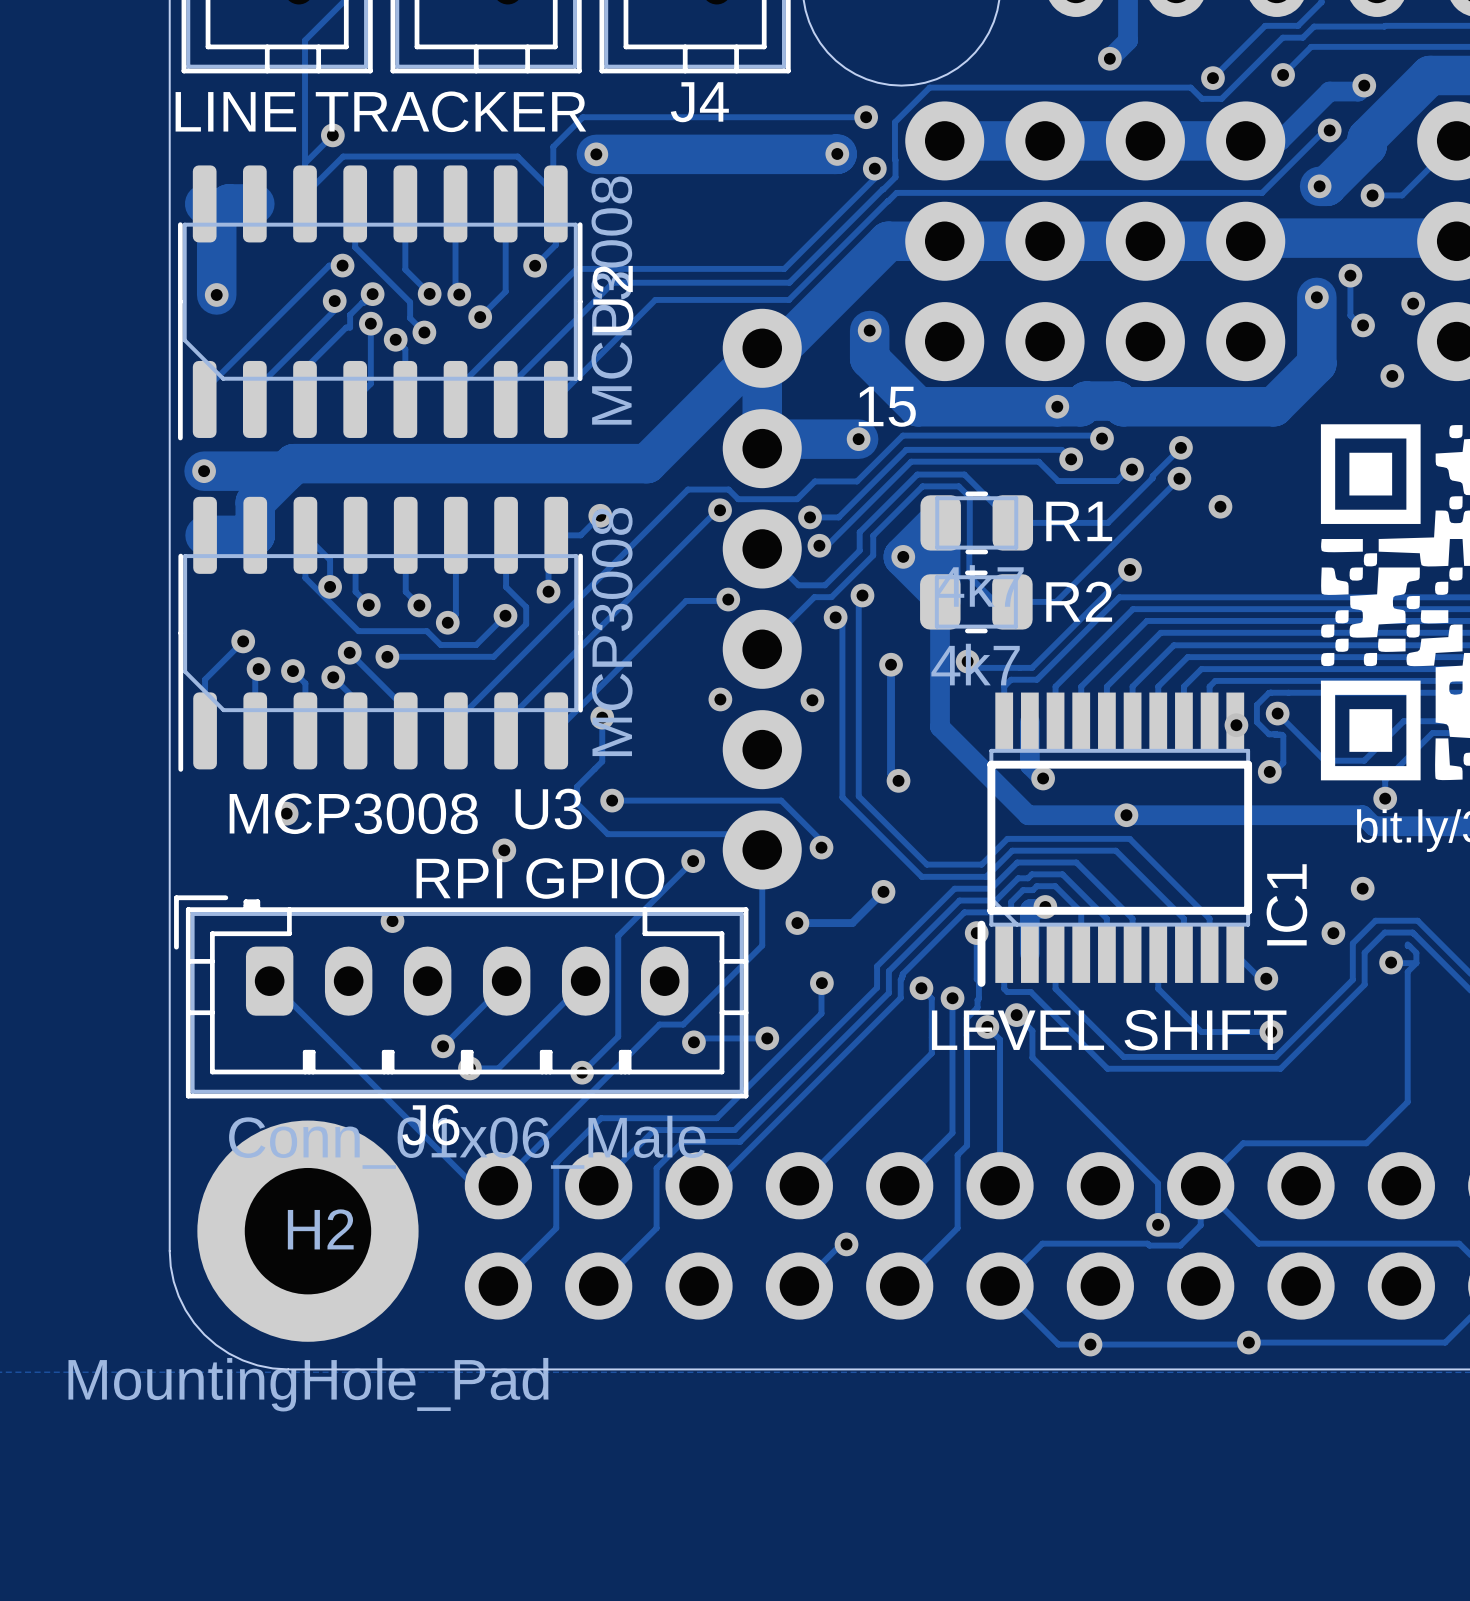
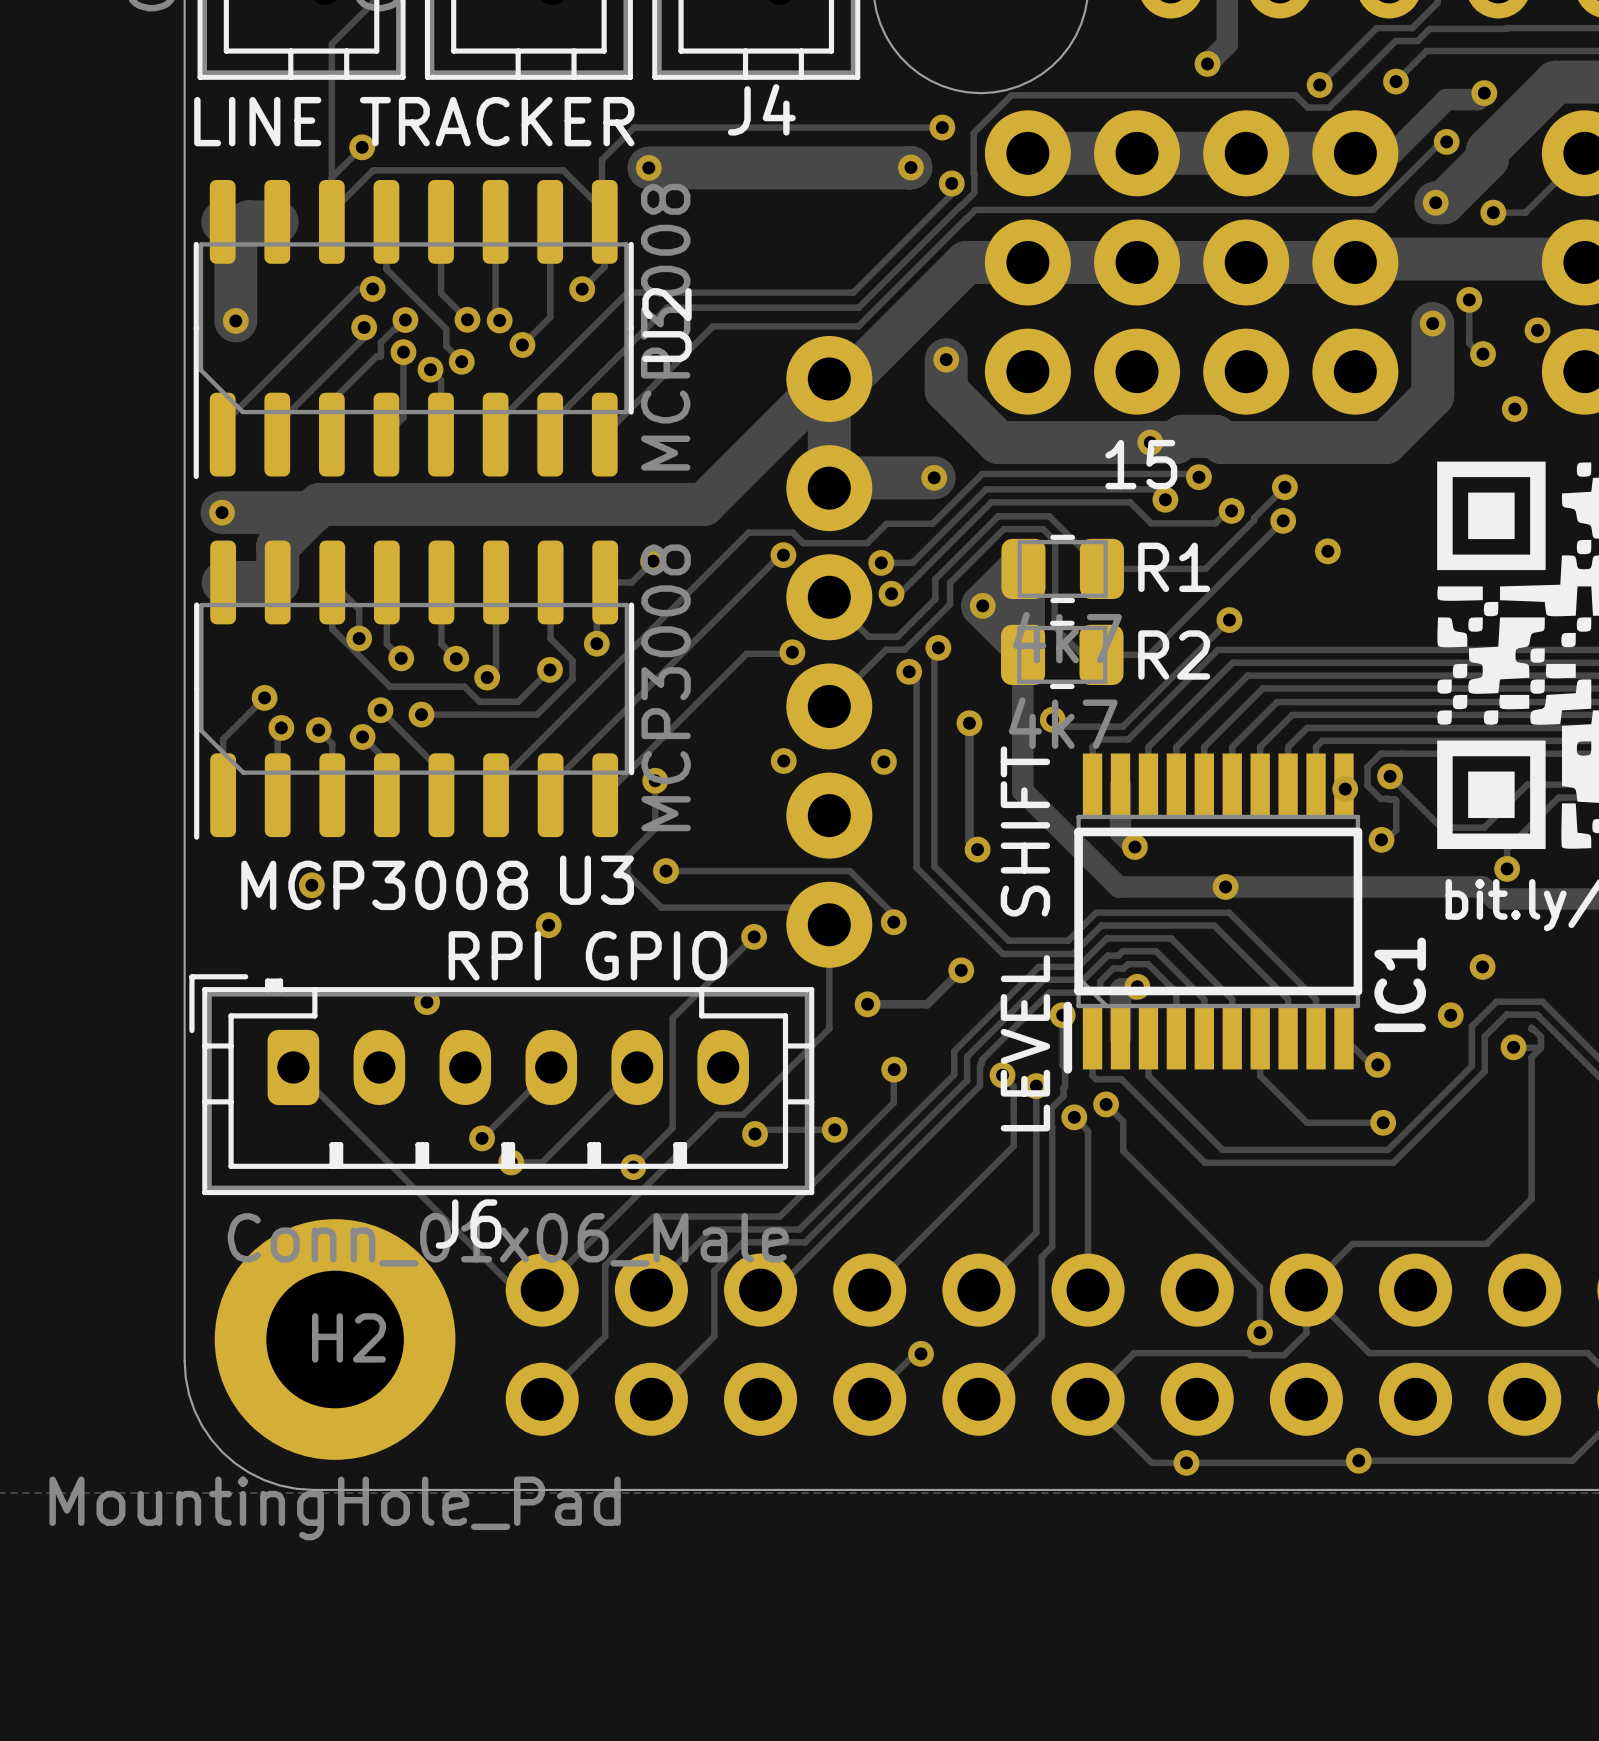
text position: 15 (887, 406) -> 15 (1141, 464)
text rotation: 0° (1109, 1030) -> 90° counterclockwise (1025, 938)

